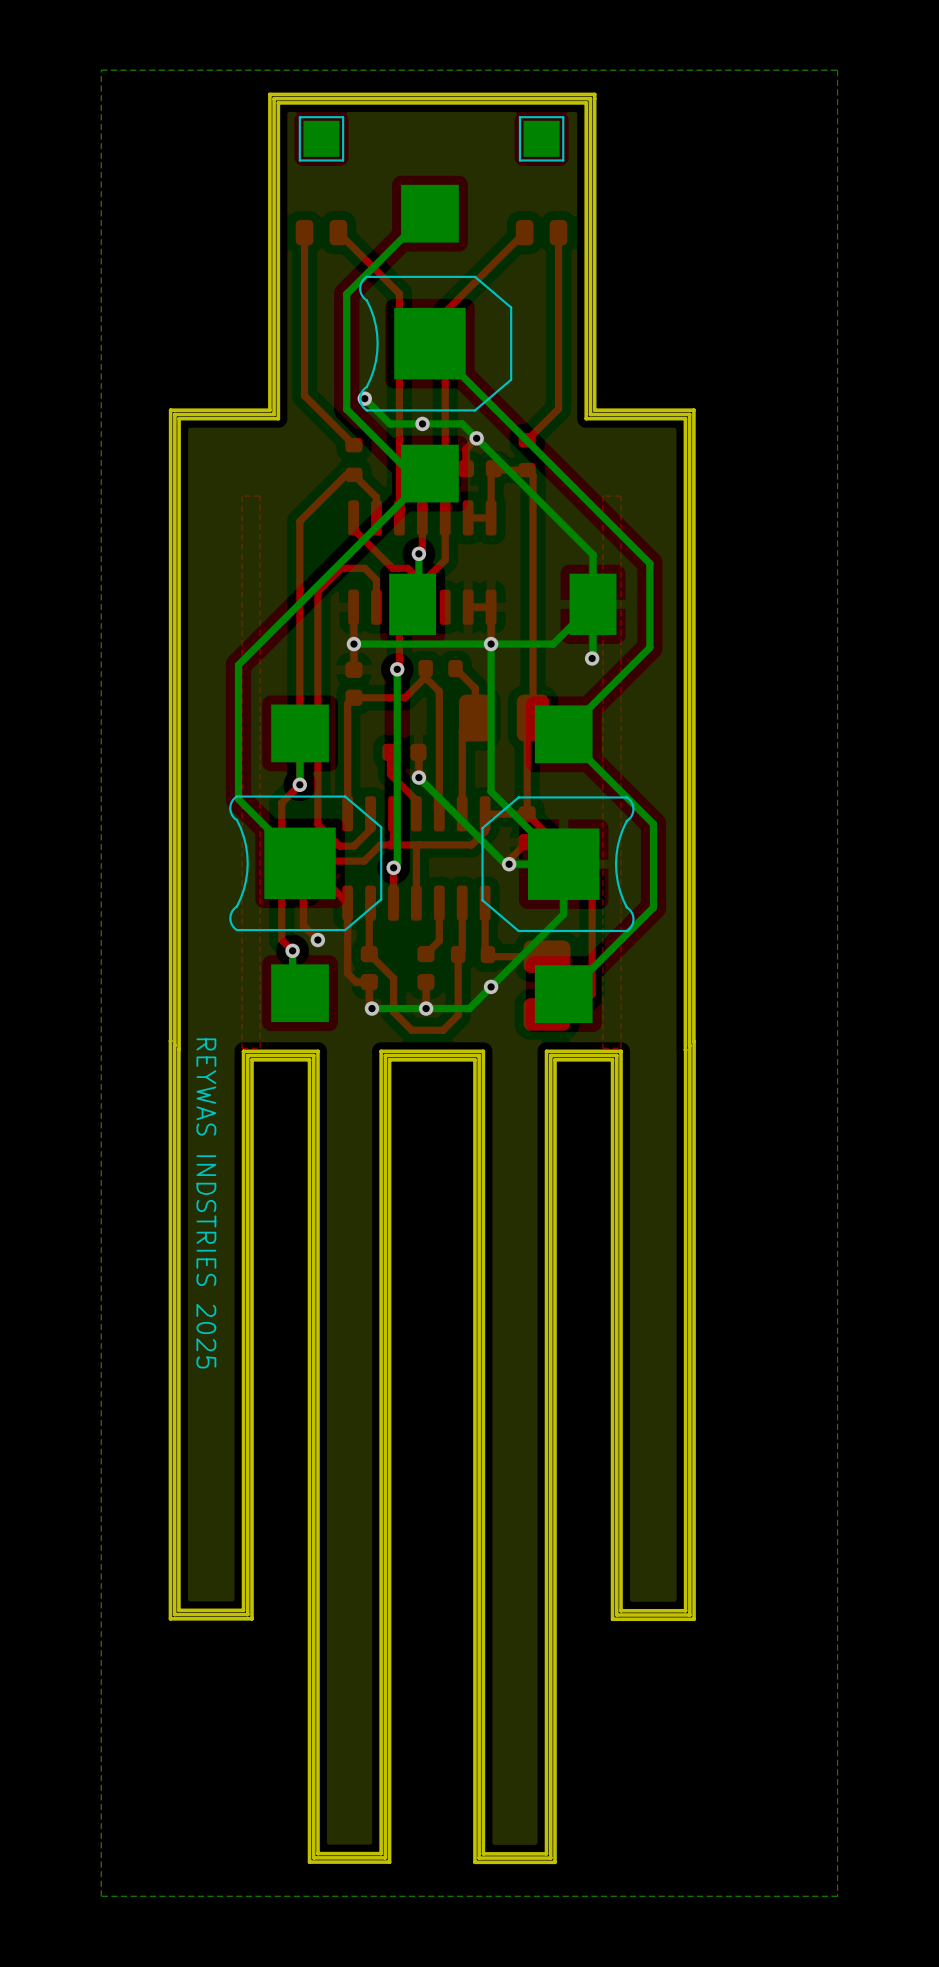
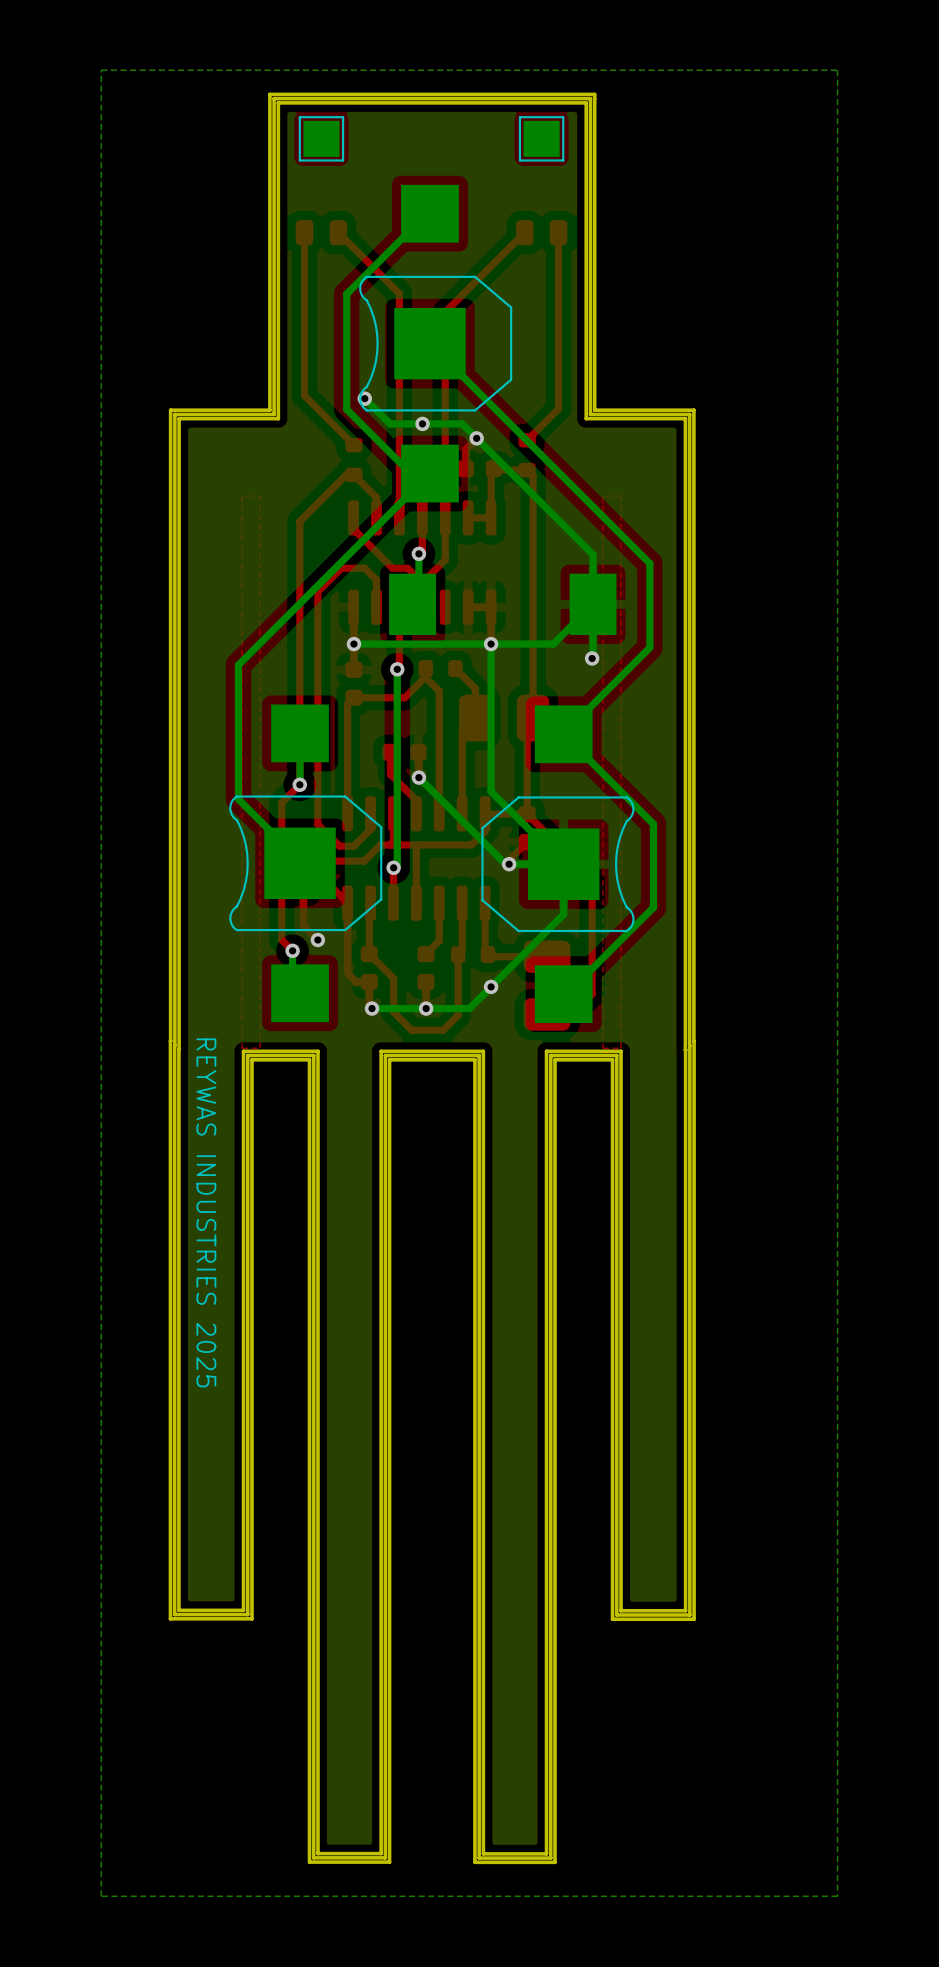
text: REYWAS INDSTRIES 2025 (206, 1203) -> REYWAS INDUSTRIES 2025 (206, 1212)

